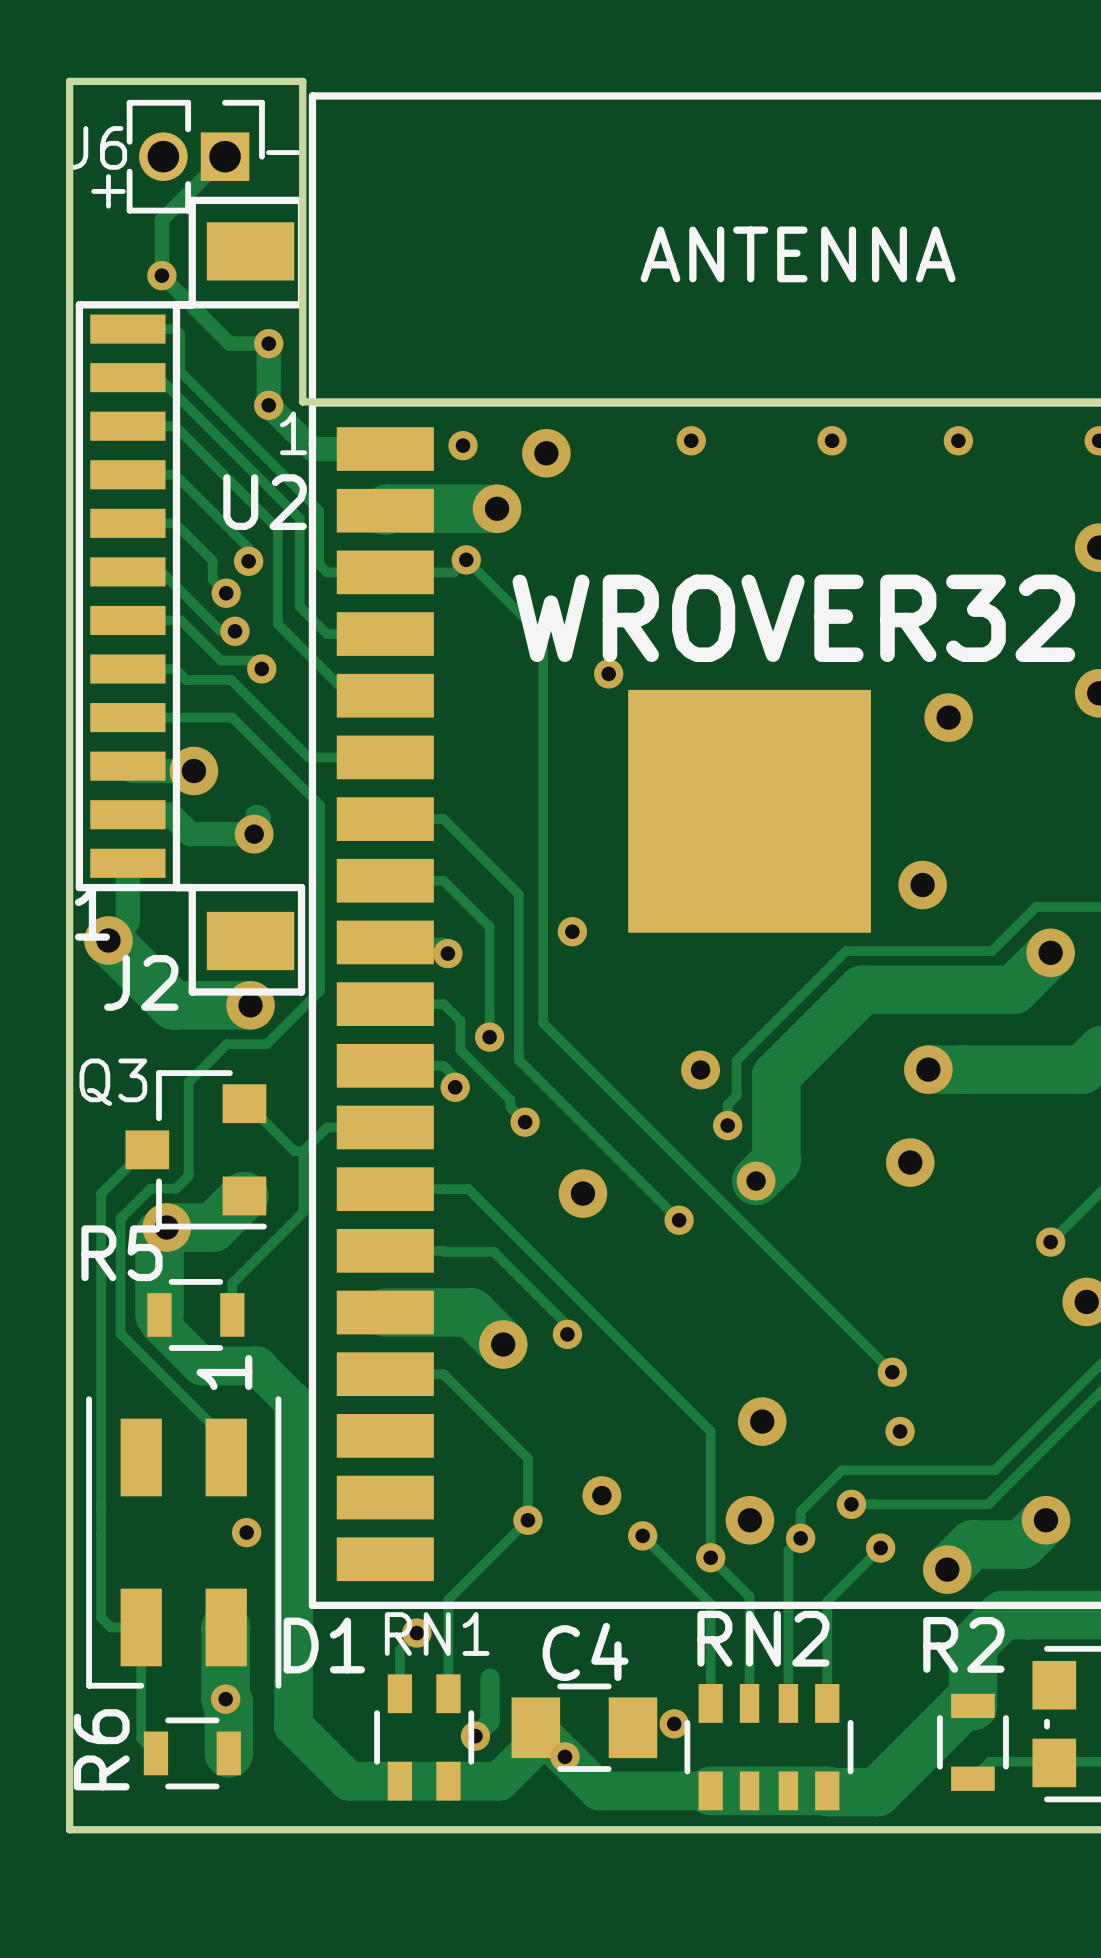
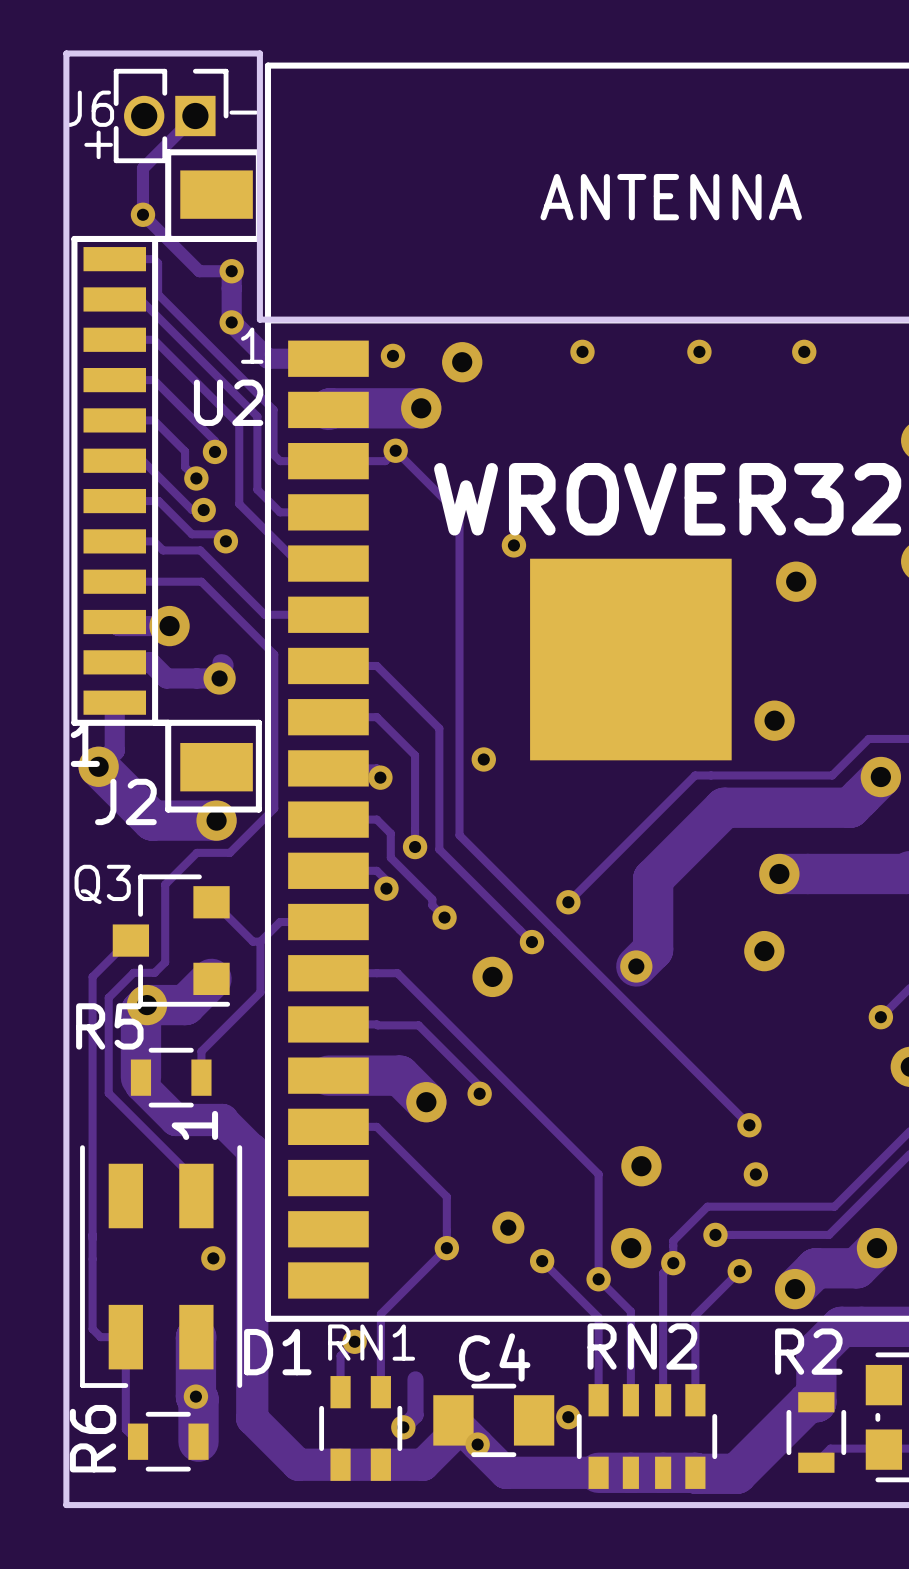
track: (846, 951) (736, 1060) (736, 1095) (727, 1104) (727, 1125) -> (711, 775) (695, 775) (568, 902)
track: (518, 1040) (518, 1059) (679, 1220) -> (439, 849) (531, 942)
via position: (700, 1070) -> (568, 902)
via: (727, 1125) -> none
via: none -> (531, 942)
via: (679, 1220) -> none

